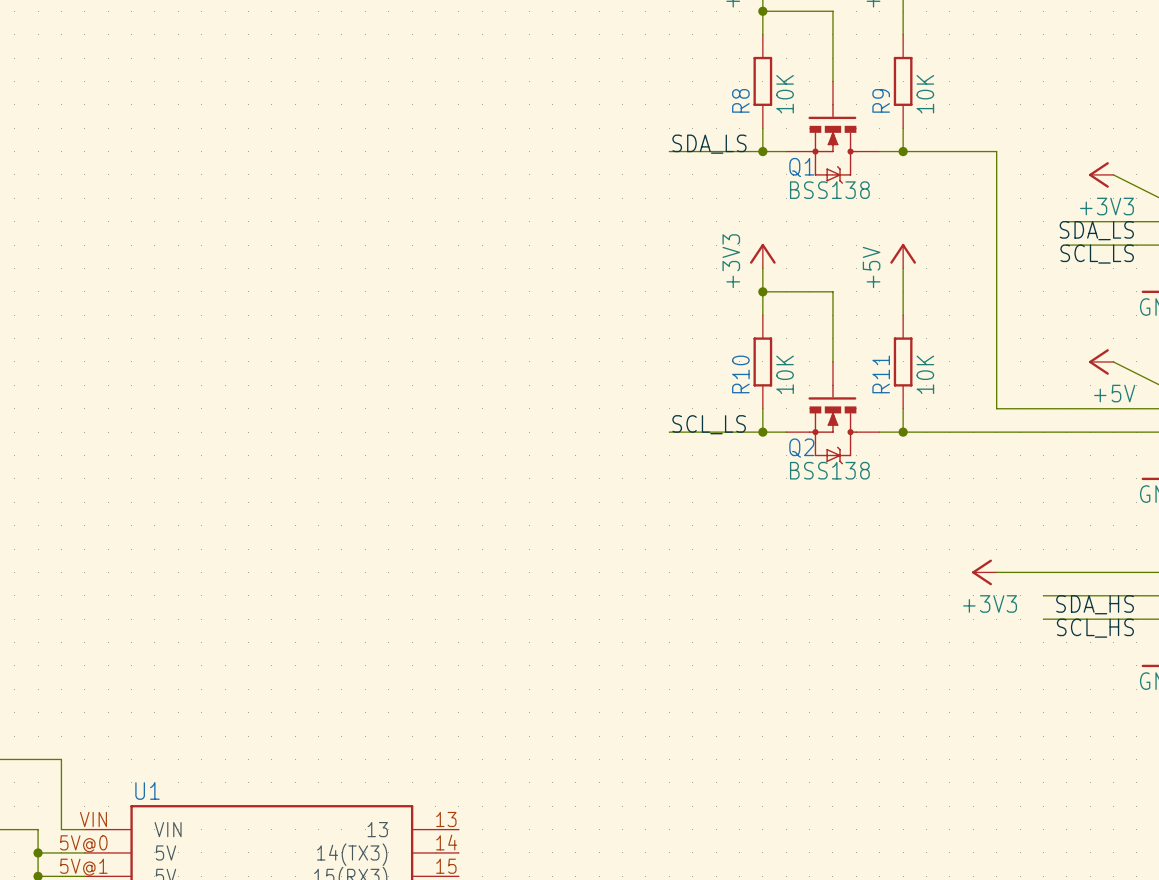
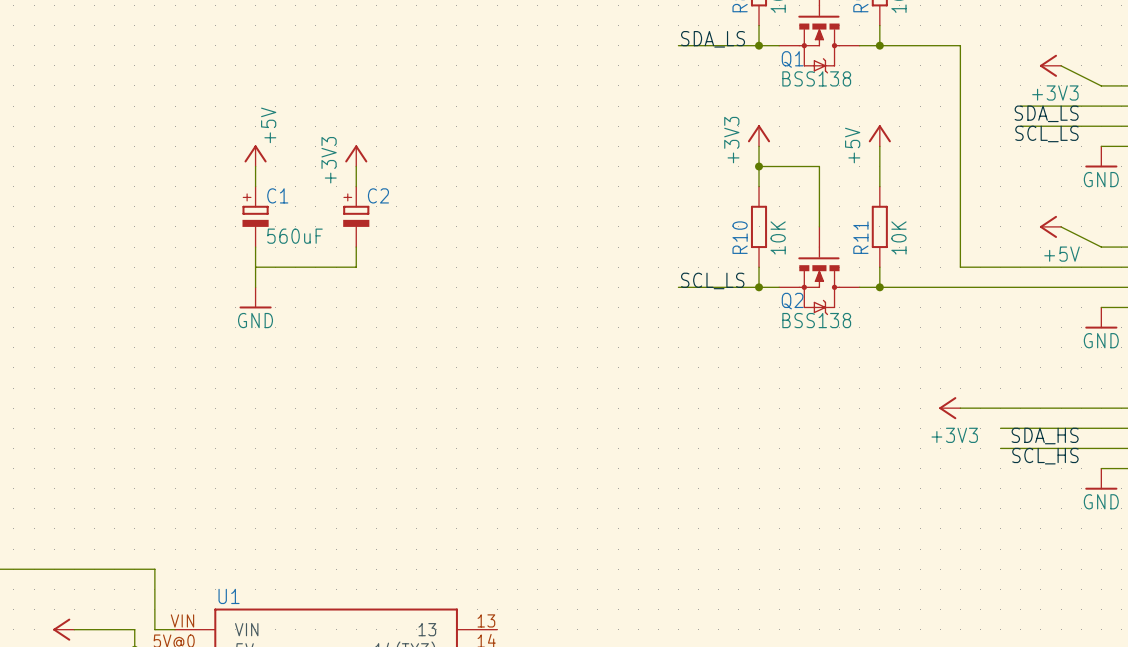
power symbol: none -> +5V (255, 155)
power symbol: none -> +3V3 (356, 155)
wire: none -> (255, 166) (255, 186)
wire: none -> (356, 166) (356, 186)
C1: none -> 560uF (255, 216)
C2: none -> (356, 216)
wire: none -> (255, 247) (255, 287)
wire: none -> (356, 247) (356, 267) (255, 267)
power symbol: none -> GND (255, 297)

